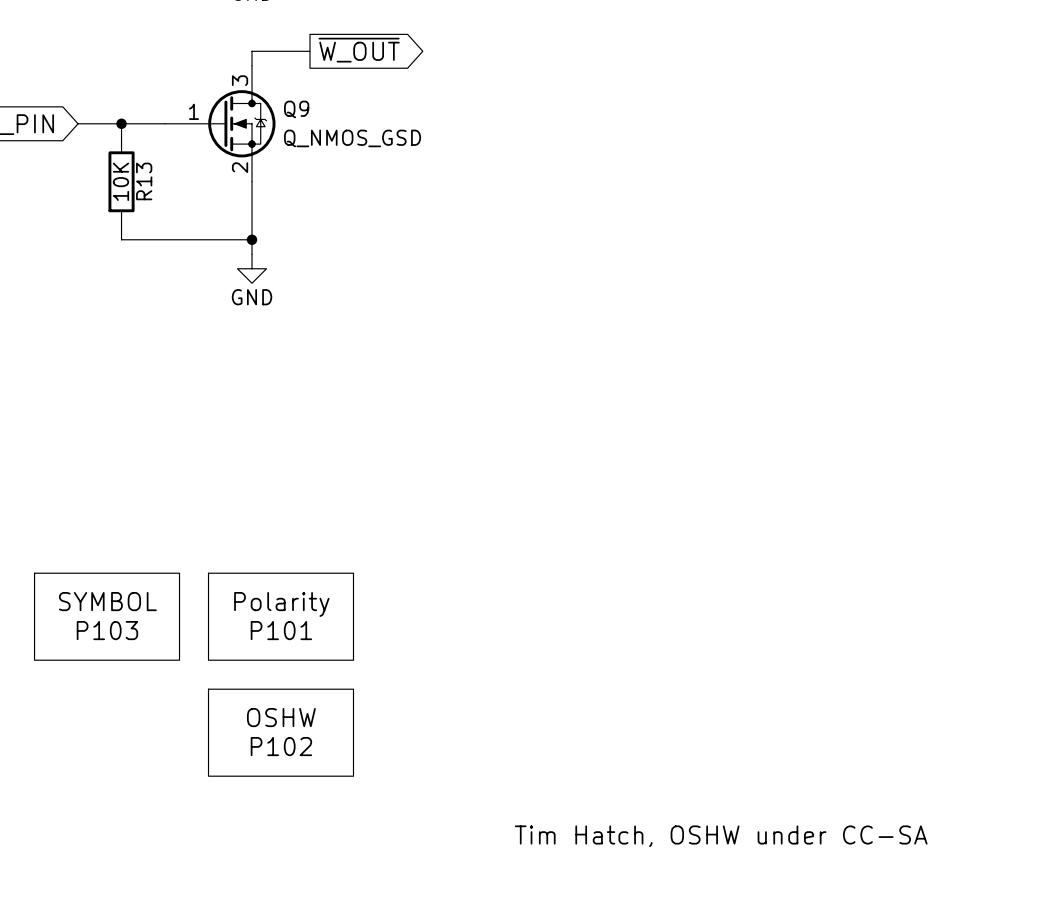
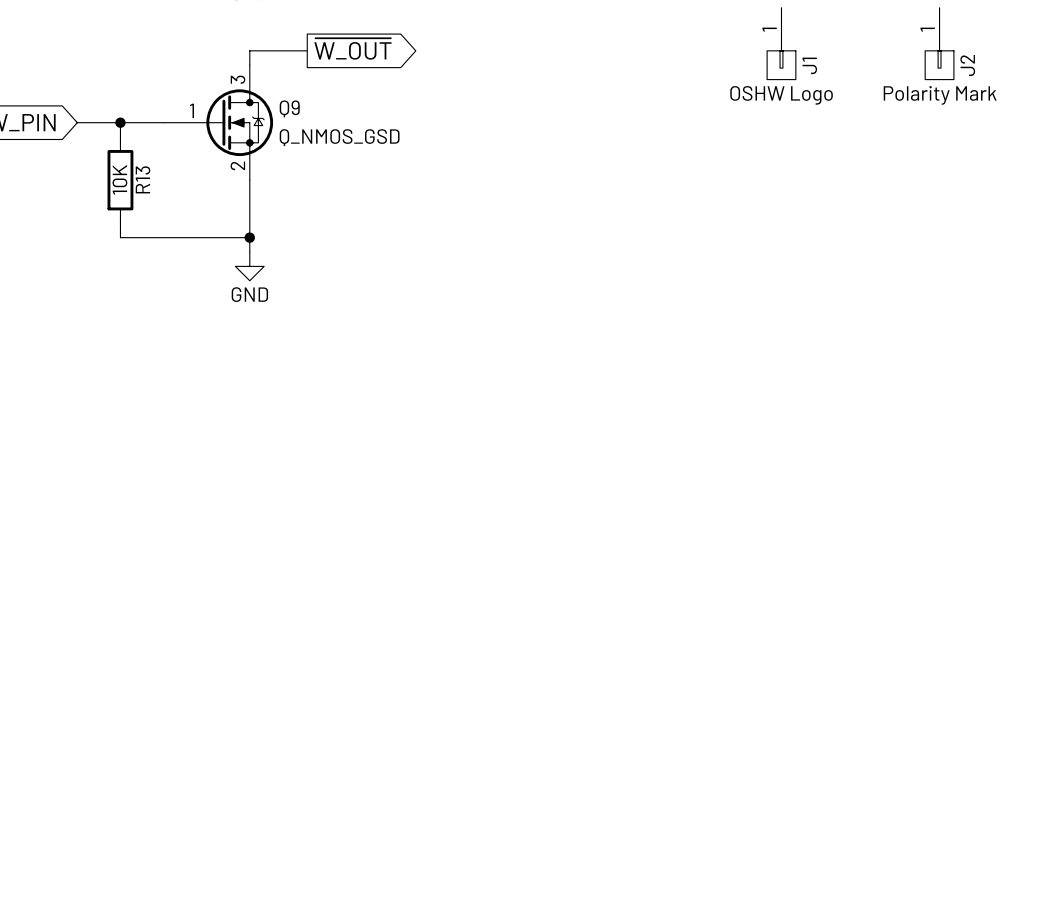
J1: none -> OSHW Logo (781, 43)
J2: none -> Polarity Mark (939, 43)
P103: SYMBOL (107, 616) -> none
P101: Polarity (281, 616) -> none
P102: OSHW (281, 732) -> none
text: Tim Hatch, OSHW under CC-SA (721, 836) -> none

